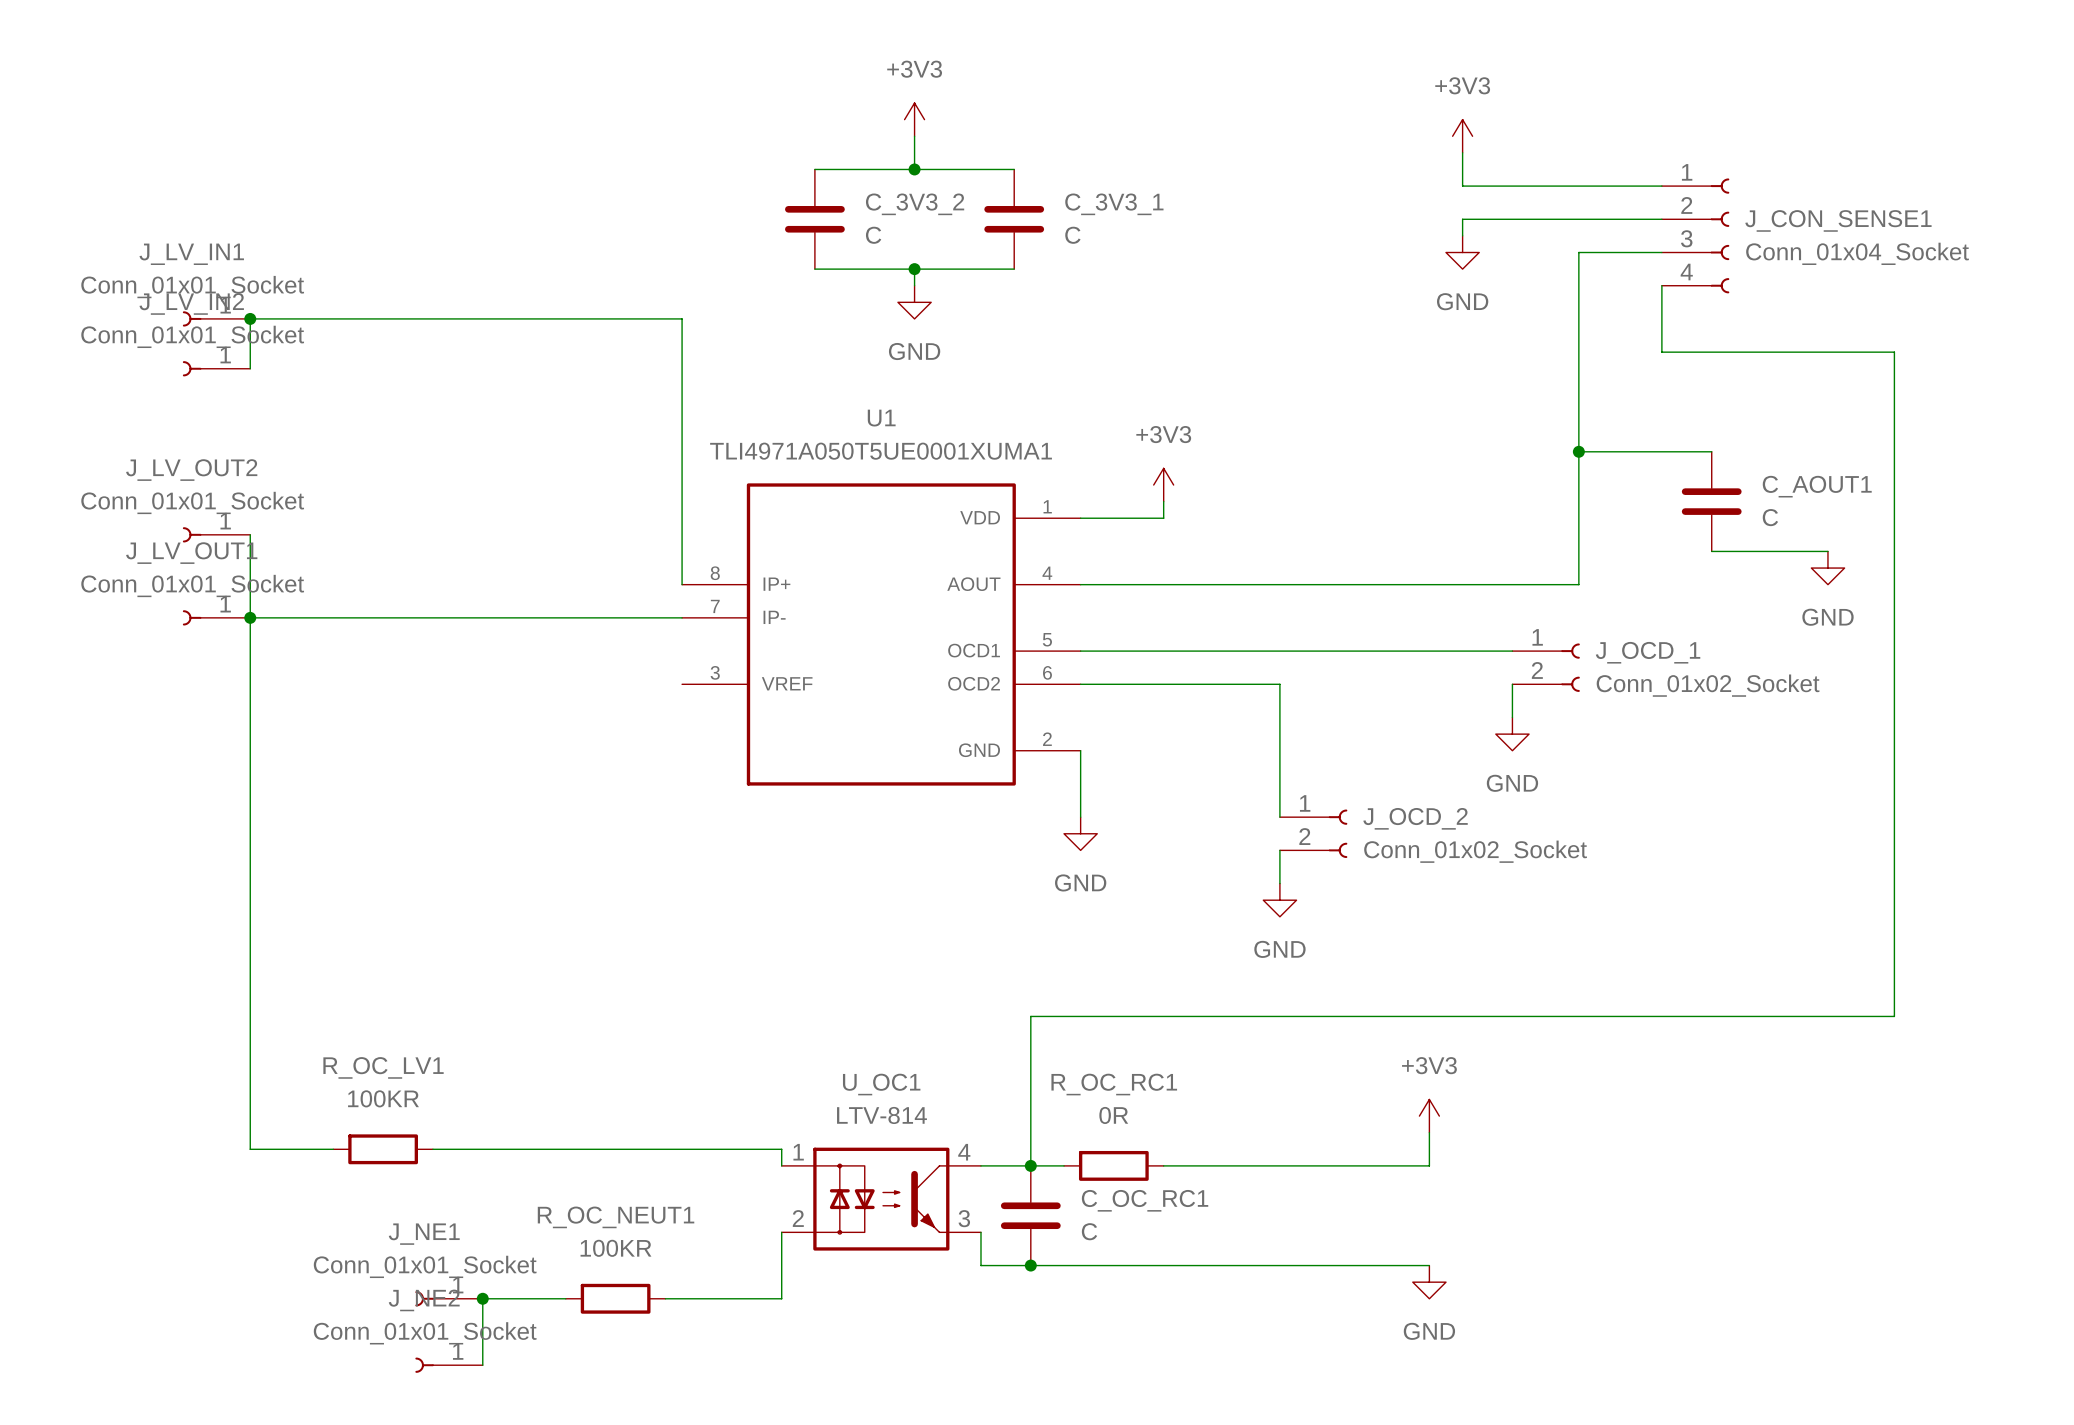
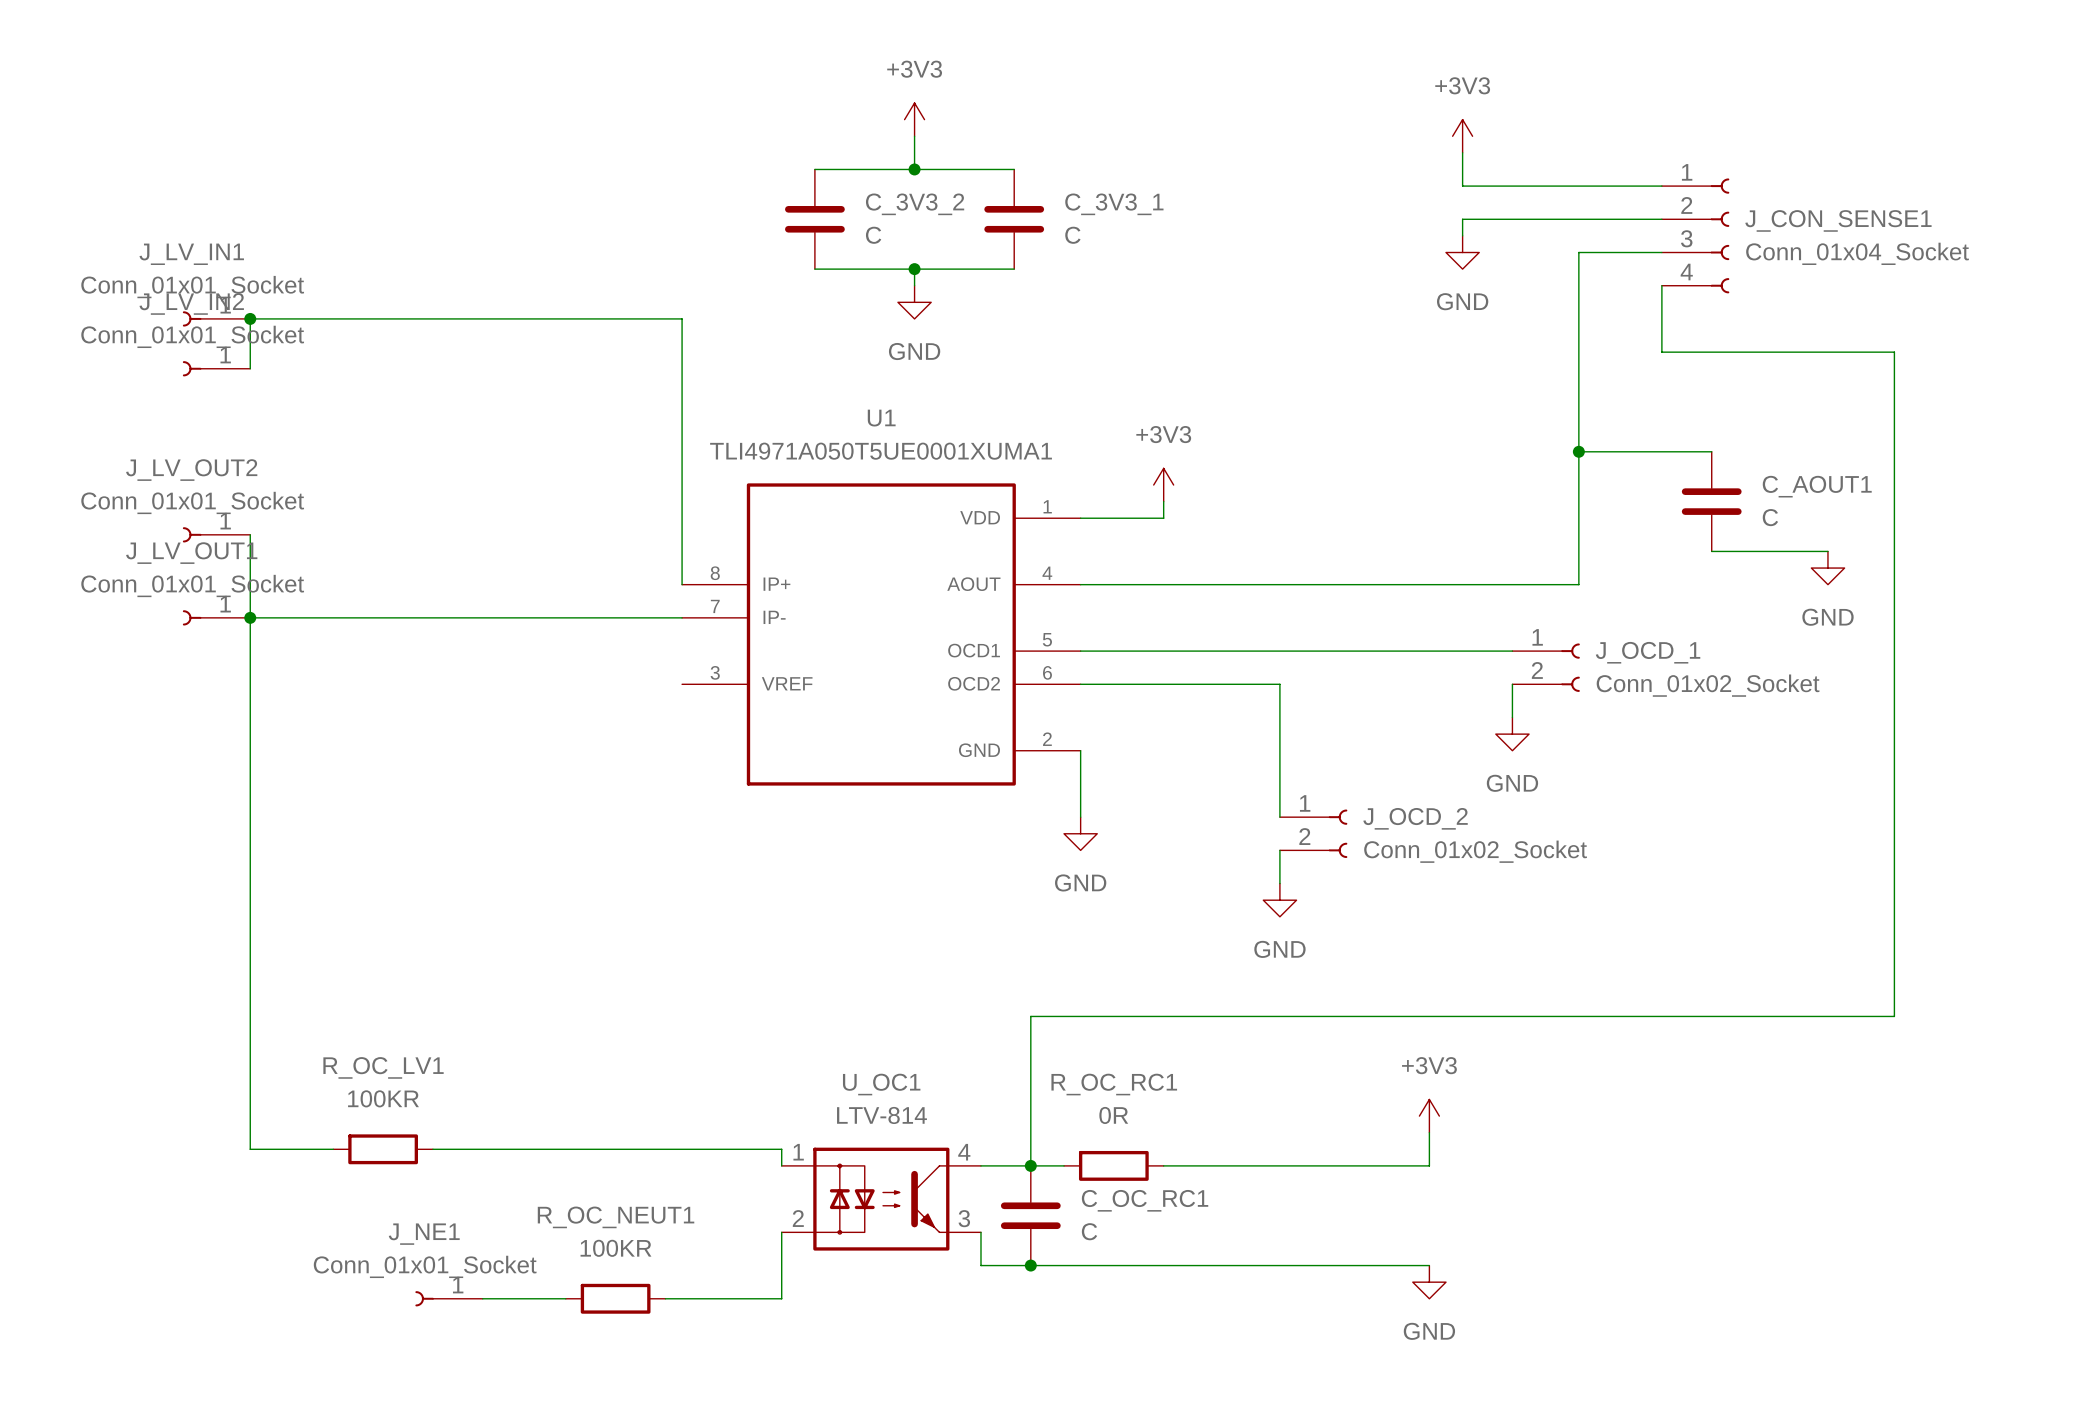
wire: (482, 1298) (482, 1365) -> none
junction: (482, 1298) -> none
J_NE2: Conn_01x01_Socket (449, 1365) -> none

